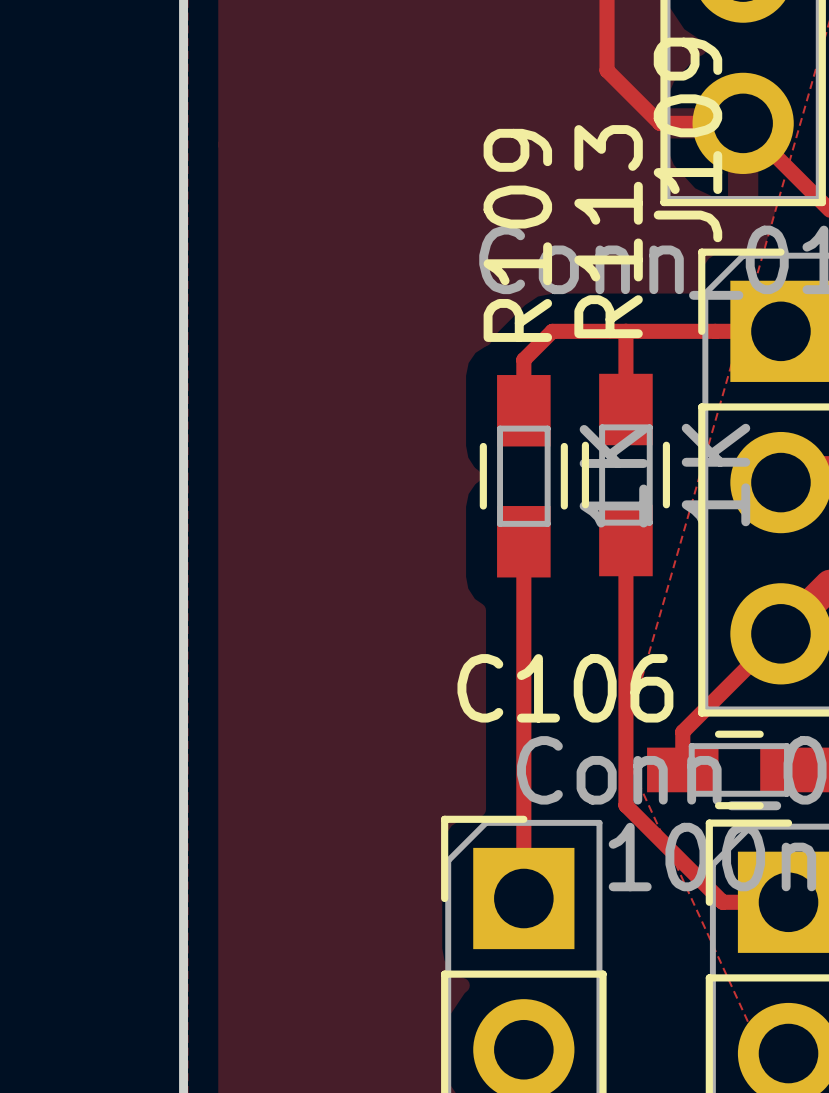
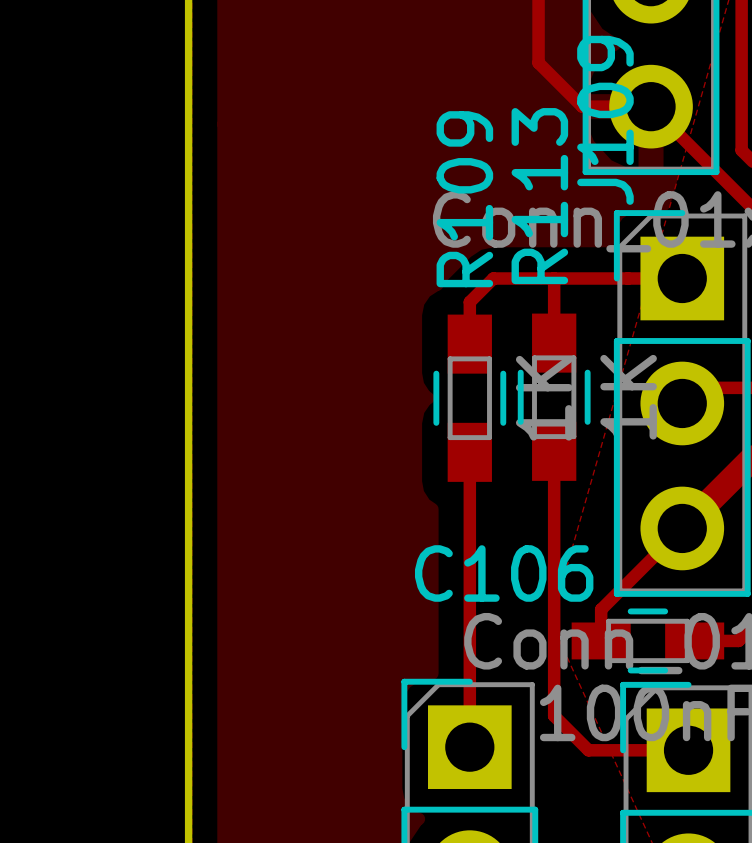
track: (625, 805) (722, 902) -> (554, 670) (554, 715) (588, 750) (634, 750)

